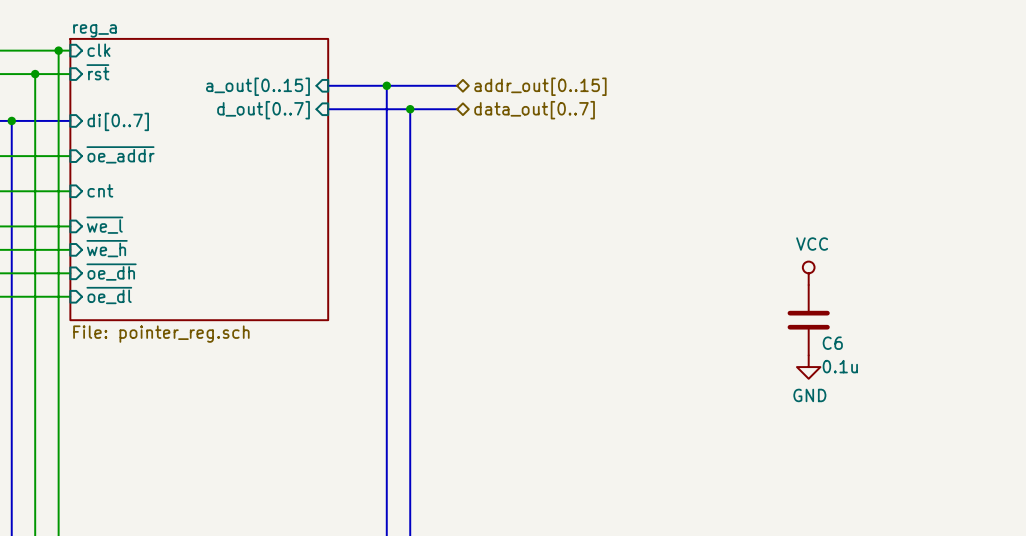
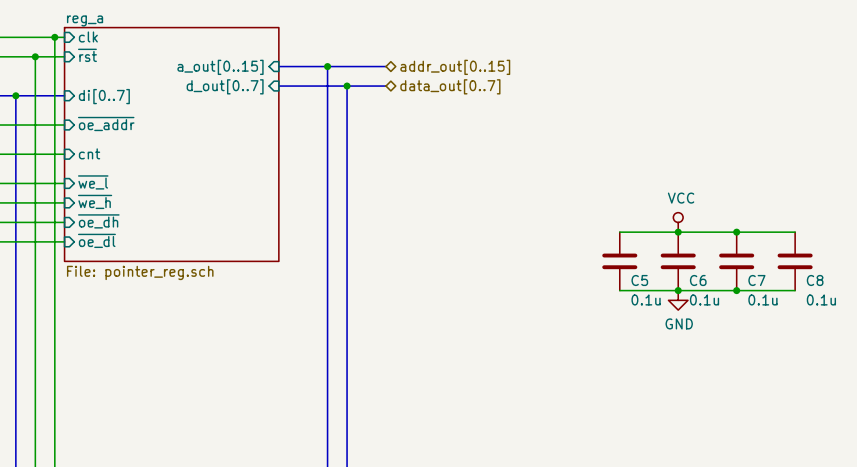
wire: none -> (619, 232) (795, 232)
junction: none -> (678, 232)
junction: none -> (736, 232)
C5: none -> 0.1u (619, 261)
C7: none -> 0.1u (736, 261)
C8: none -> 0.1u (795, 261)
wire: none -> (619, 290) (795, 290)
junction: none -> (678, 290)
junction: none -> (736, 290)

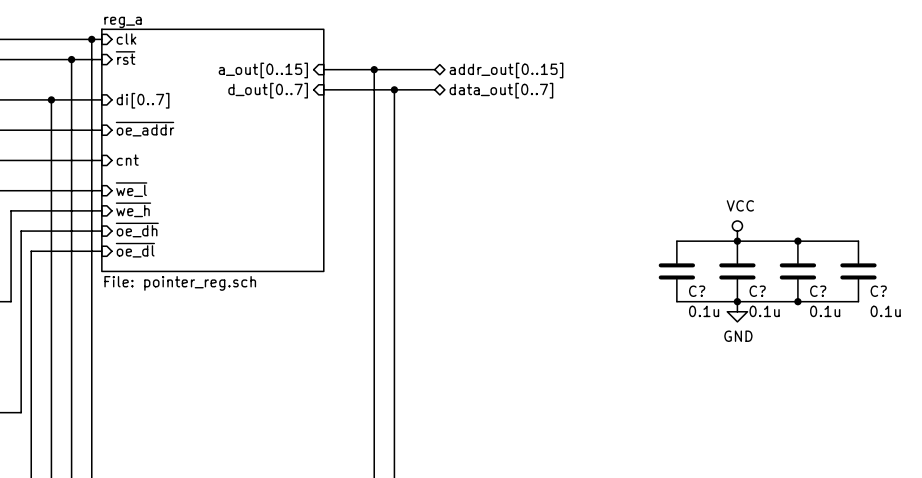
C5 name: C5 (639, 280) -> C? (697, 291)
C6 name: C6 (698, 280) -> C? (757, 291)
C7 name: C7 (756, 280) -> C? (818, 291)
C8 name: C8 (815, 280) -> C? (878, 291)

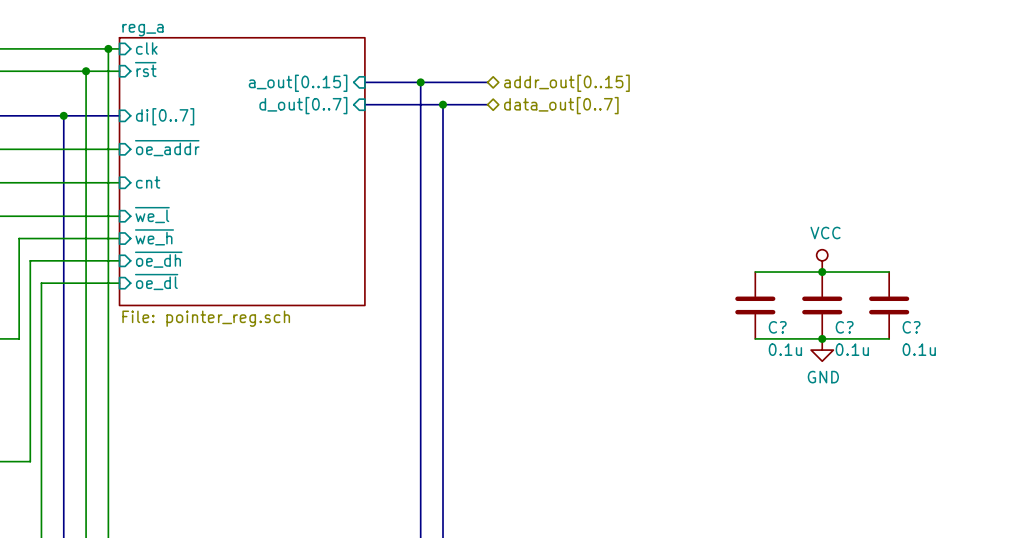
wire: (797, 241) (858, 241) -> none
junction: (797, 241) -> none
C?: 0.1u (858, 271) -> none
wire: (797, 301) (858, 301) -> none
junction: (797, 301) -> none

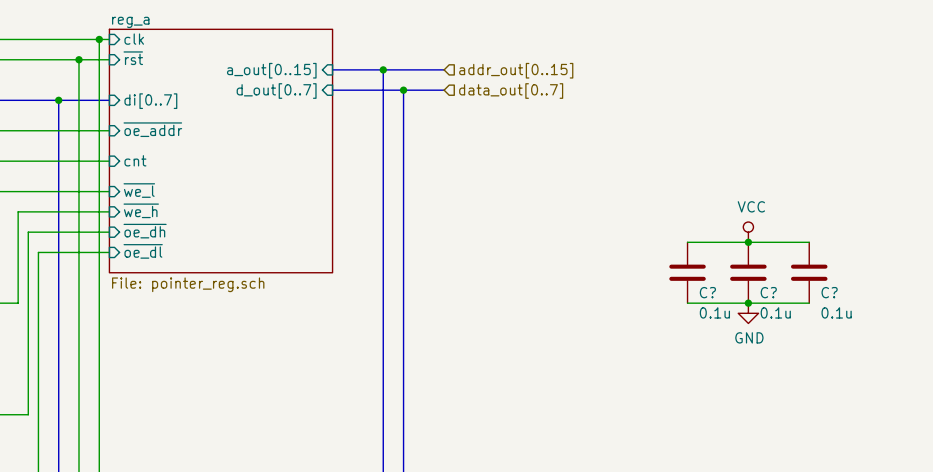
hierarchical label shape: bidirectional (566, 83) -> input (516, 70)
hierarchical label shape: bidirectional (561, 105) -> input (511, 91)

